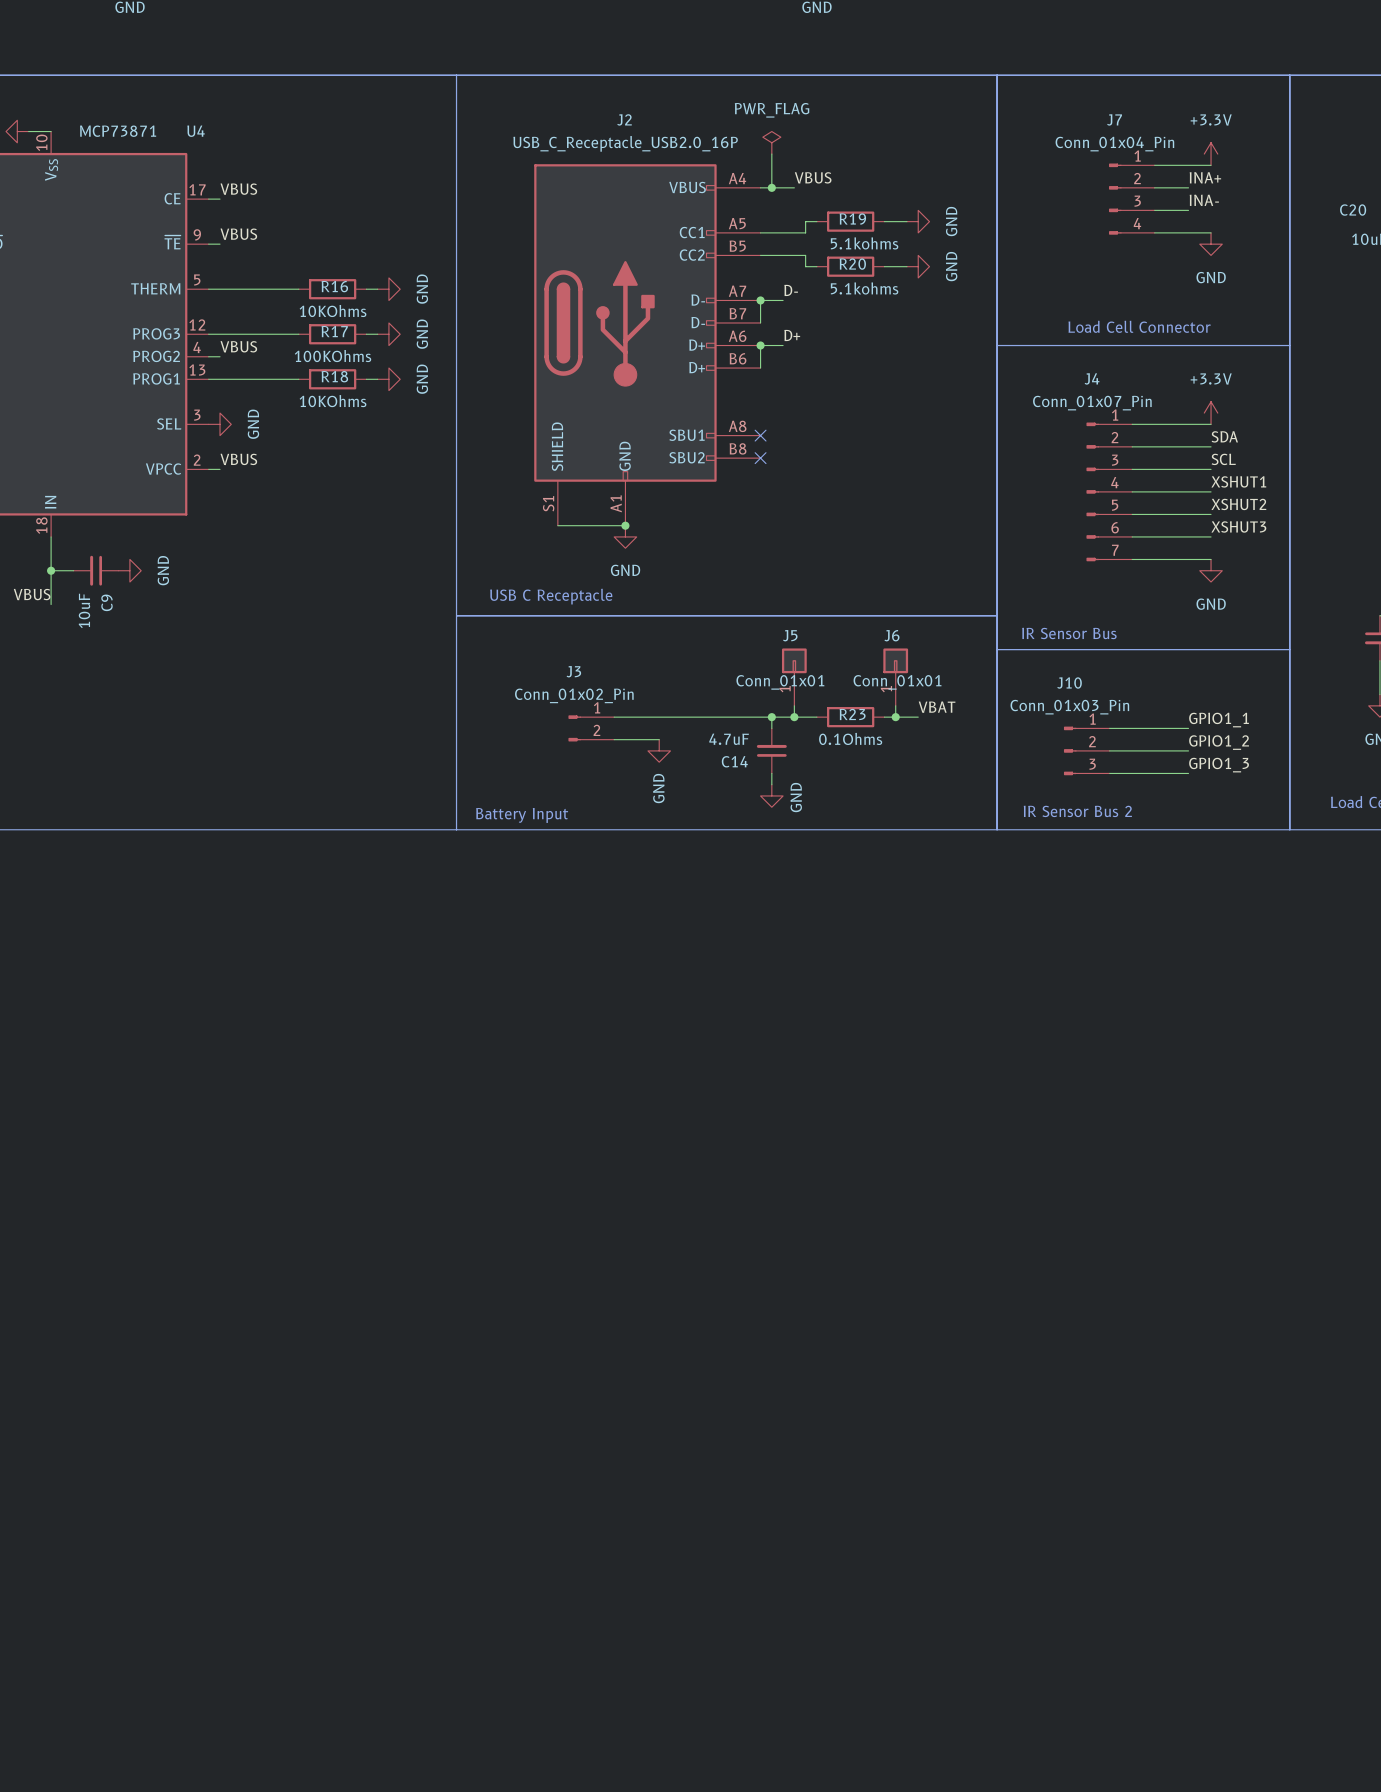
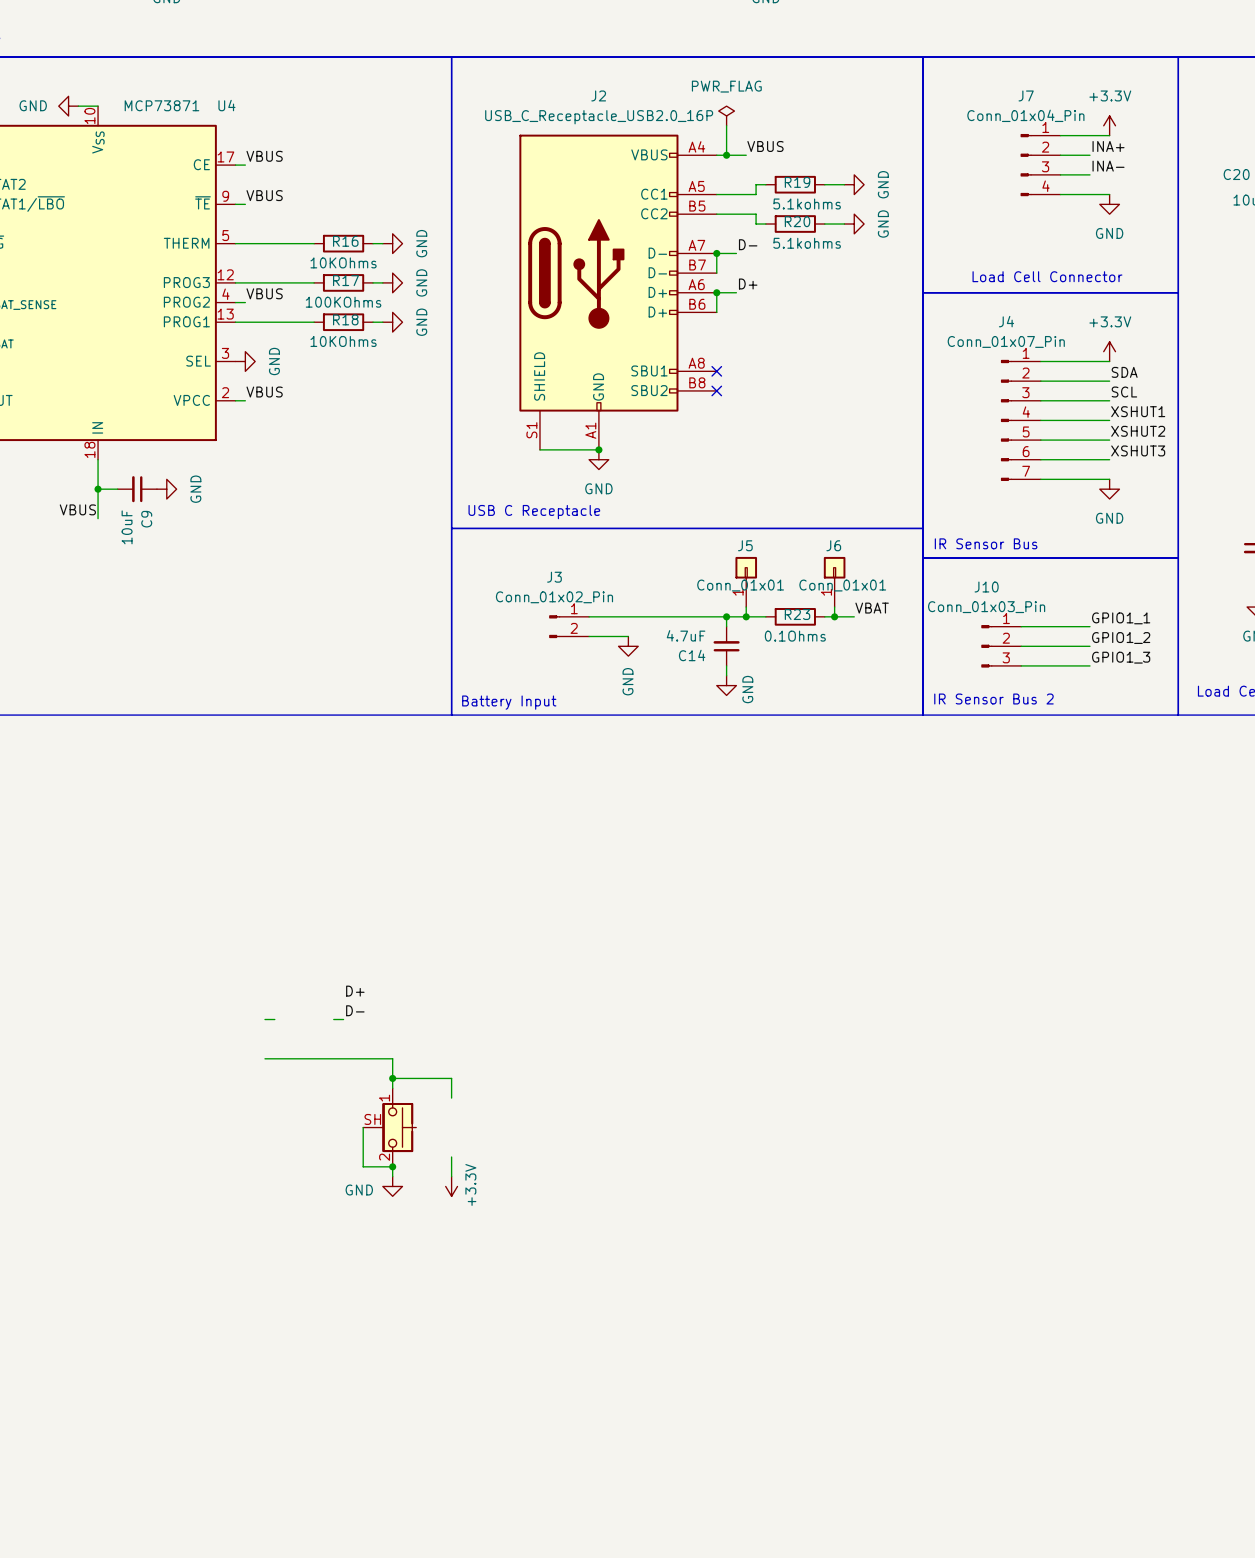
label: none -> D+ (355, 991)
label: none -> D- (355, 1010)
wire: none -> (265, 1019) (274, 1019)
wire: none -> (333, 1019) (343, 1019)
wire: none -> (265, 1058) (392, 1058) (392, 1088)
wire: none -> (392, 1078) (451, 1078) (451, 1098)
junction: none -> (392, 1078)
wire: none -> (363, 1127) (363, 1166) (392, 1166) (392, 1176)
part: none -> (389, 1127)
wire: none -> (451, 1157) (451, 1176)
junction: none -> (392, 1166)
power symbol: none -> GND (392, 1186)
power symbol: none -> +3.3V (451, 1186)

